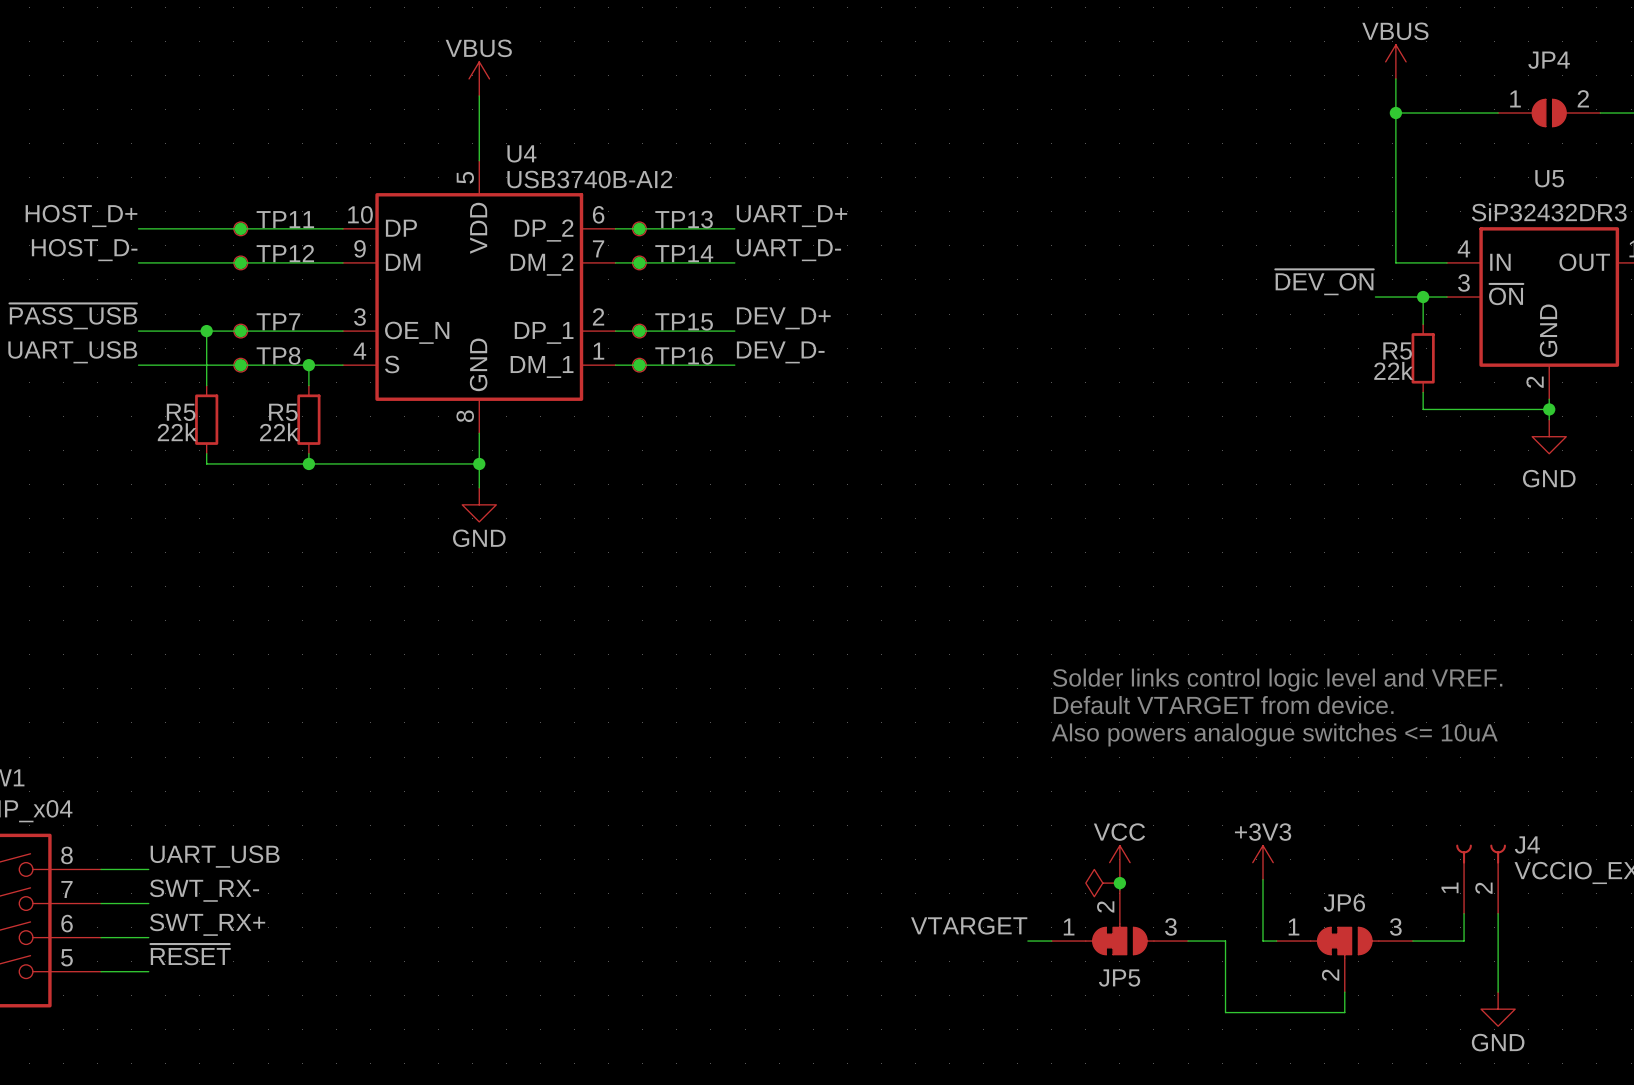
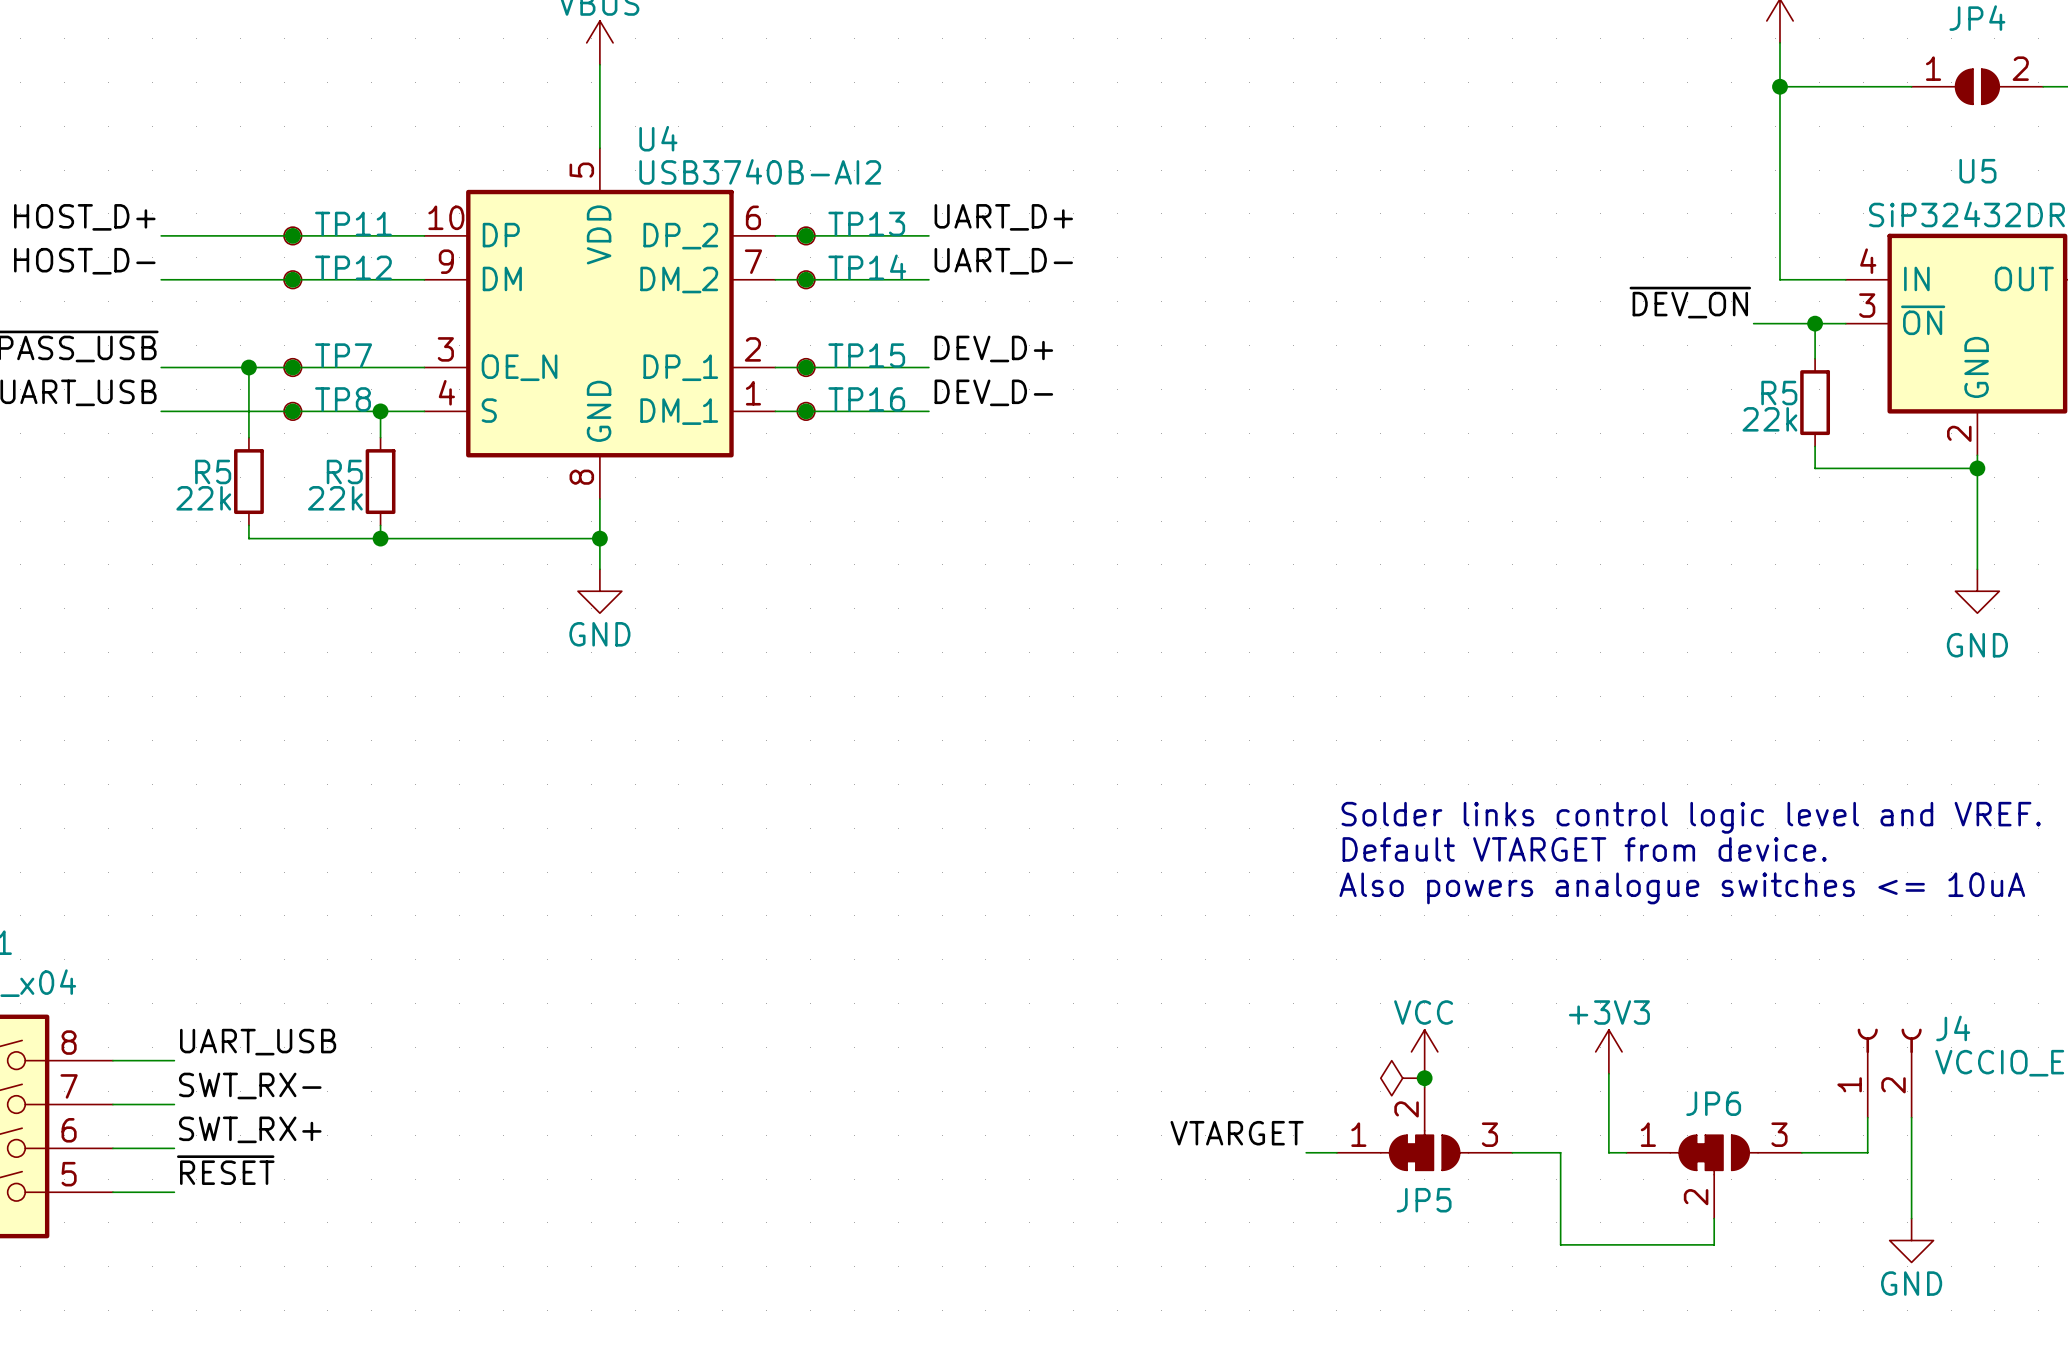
wire: none -> (1977, 481) (1977, 569)
power symbol position: GND (1549, 436) -> GND (1977, 591)

